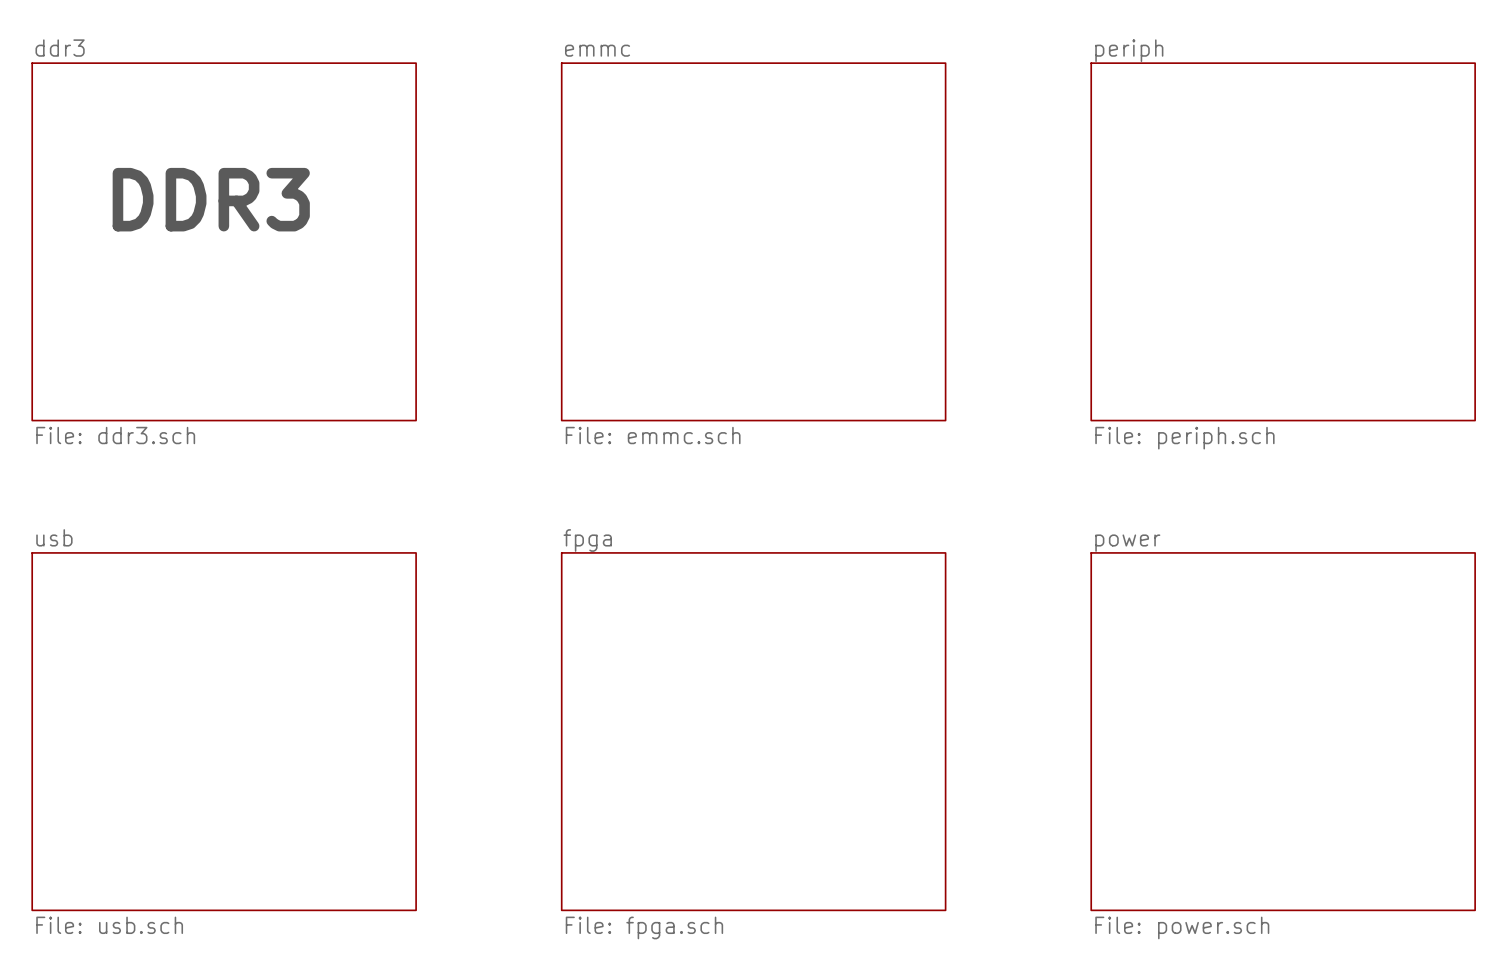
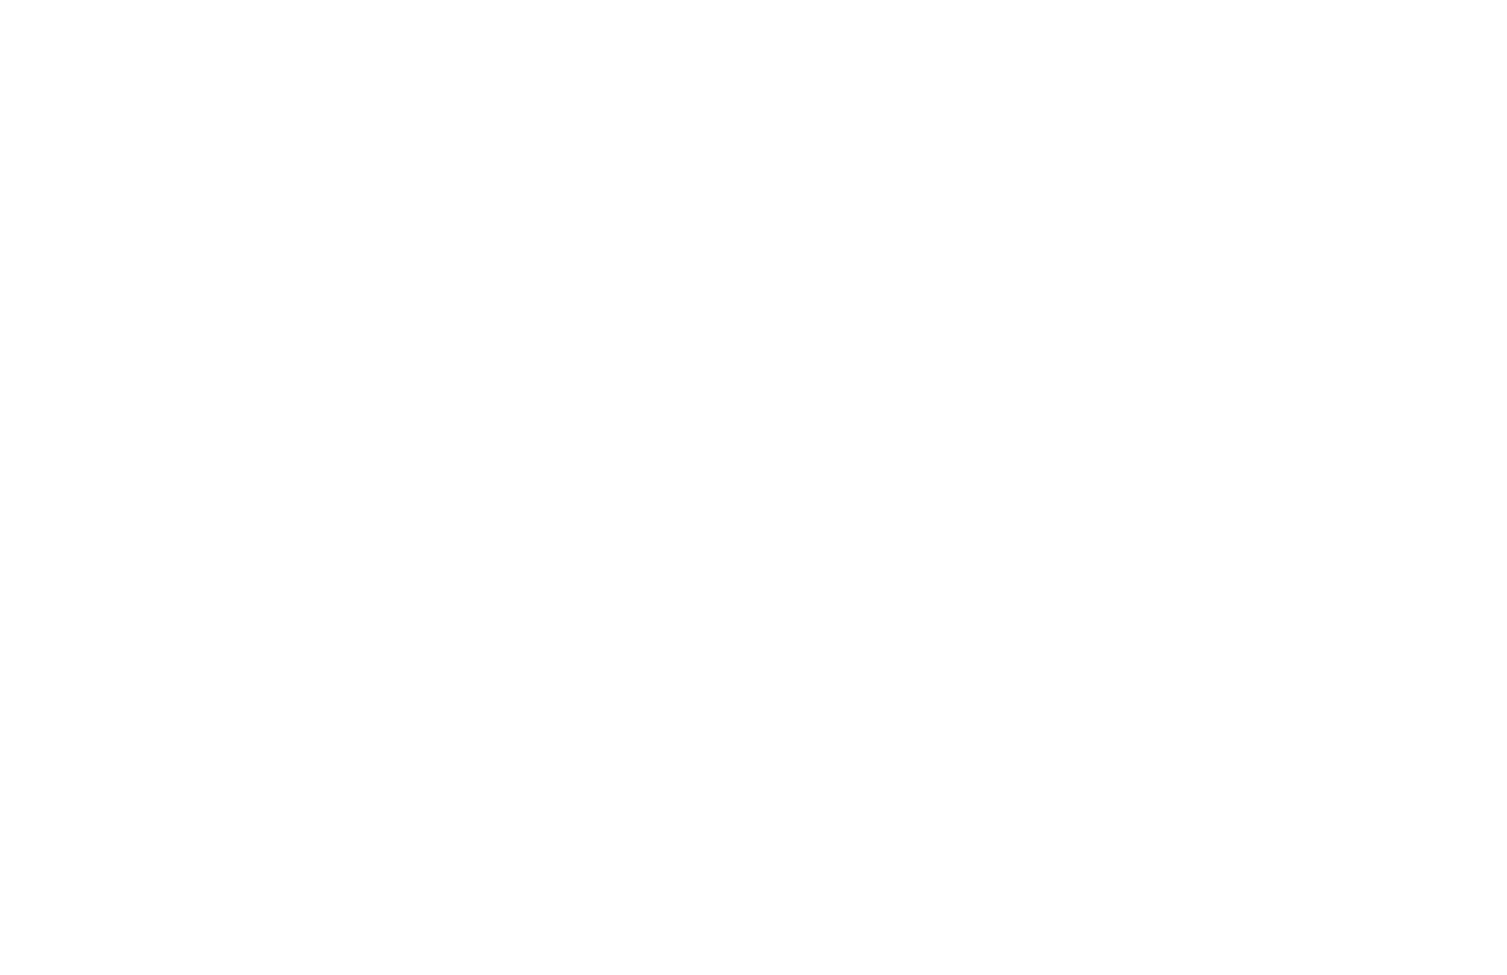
text: DDR3 (211, 199) -> none
sheet ddr3: File: ddr3.sch (224, 241) -> none
sheet emmc: File: emmc.sch (753, 241) -> none
sheet periph: File: periph.sch (1283, 241) -> none
sheet usb: File: usb.sch (224, 731) -> none
sheet fpga: File: fpga.sch (753, 731) -> none
sheet power: File: power.sch (1283, 731) -> none

